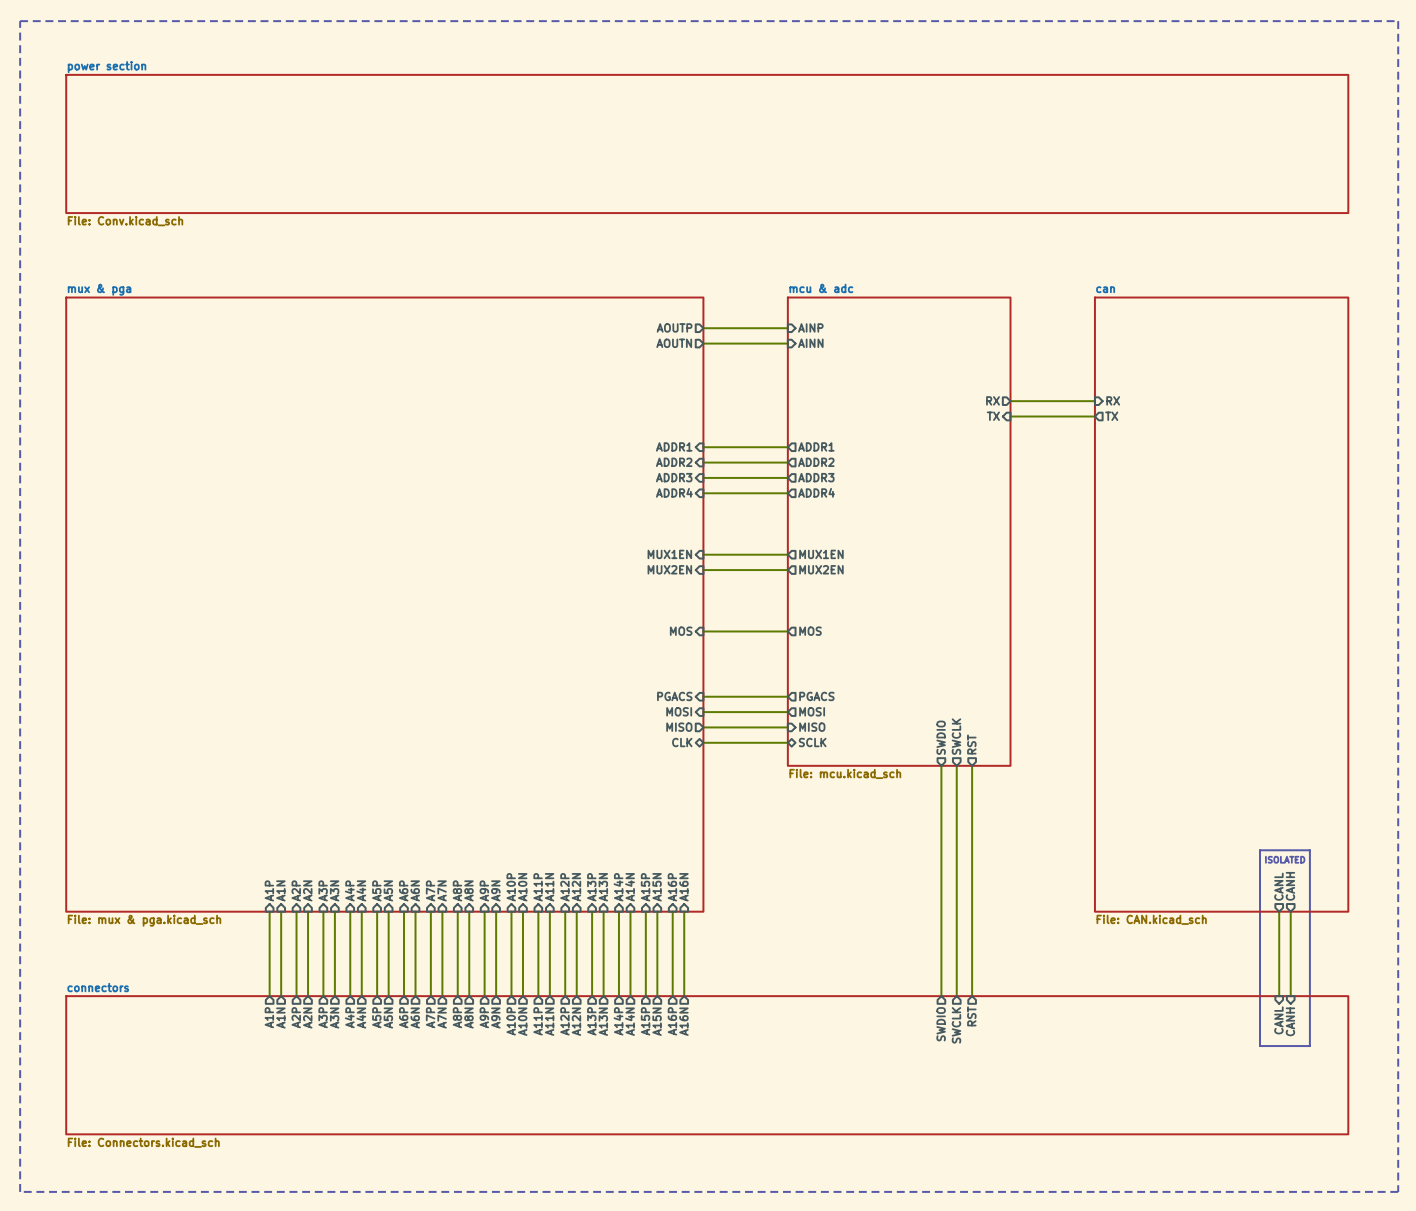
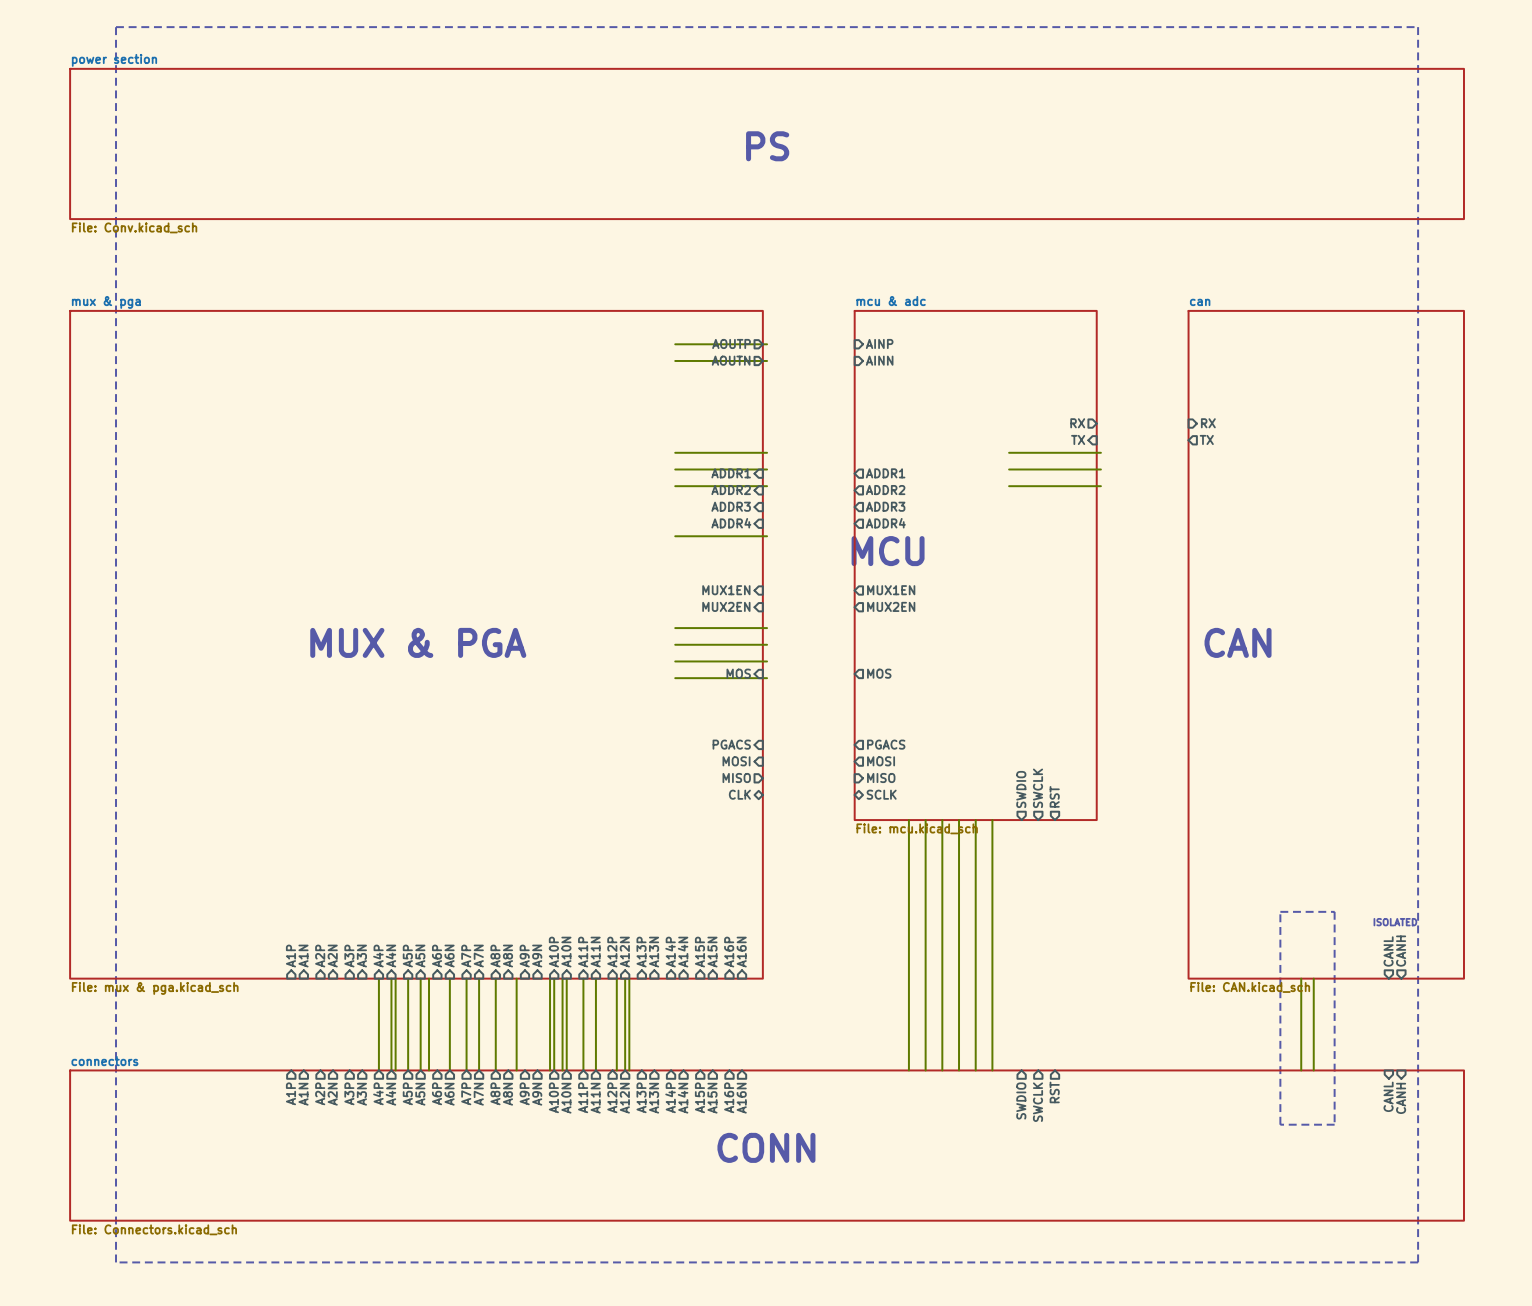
line: (20, 21) (1398, 21) (1398, 1191) (20, 1191) (20, 21) -> (116, 27) (116, 1262) (1418, 1262) (1418, 27) (116, 27)
text: none -> PS (767, 146)
wire: (707, 328) (787, 328) -> (675, 344) (762, 344)
wire: (707, 343) (787, 343) -> (675, 360) (762, 360)
wire: (1010, 401) (1094, 401) -> (1009, 469) (1100, 469)
wire: (1010, 416) (1094, 416) -> (1009, 452) (1100, 452)
wire: (703, 447) (787, 447) -> (675, 486) (767, 486)
wire: none -> (1009, 486) (1100, 486)
wire: (703, 462) (787, 462) -> (675, 469) (767, 469)
wire: (703, 477) (787, 477) -> (675, 452) (767, 452)
wire: (703, 493) (787, 493) -> (675, 536) (767, 536)
text: none -> MCU (888, 551)
wire: (703, 554) (787, 554) -> none
wire: (703, 570) (787, 570) -> none
text: none -> MUX & PGA (418, 642)
text: none -> CAN (1238, 642)
wire: (703, 631) (787, 631) -> none
wire: (703, 696) (787, 696) -> (675, 628) (767, 628)
wire: (703, 712) (787, 712) -> (675, 644) (767, 644)
wire: (703, 727) (787, 727) -> (675, 661) (767, 661)
wire: (703, 742) (787, 742) -> (675, 678) (767, 678)
wire: none -> (908, 820) (908, 1070)
wire: none -> (975, 820) (975, 1070)
wire: none -> (992, 820) (992, 1070)
wire: (941, 765) (941, 996) -> (925, 820) (925, 1070)
wire: (956, 765) (956, 996) -> (942, 820) (942, 1070)
wire: (972, 765) (972, 996) -> (959, 820) (959, 1070)
line: (1260, 850) (1309, 850) (1309, 1046) (1260, 1046) (1260, 850) -> (1280, 911) (1334, 911) (1334, 1124) (1280, 1124) (1280, 911)
wire: (269, 911) (269, 996) -> none
wire: (281, 911) (281, 996) -> none
wire: (296, 911) (296, 996) -> none
wire: (308, 911) (308, 996) -> none
wire: (323, 911) (323, 996) -> none
wire: (334, 911) (334, 996) -> none
wire: (404, 911) (404, 996) -> none
wire: (469, 911) (469, 996) -> (395, 978) (395, 1070)
wire: (484, 911) (484, 996) -> (429, 978) (429, 1070)
wire: (496, 911) (496, 996) -> none
wire: (565, 911) (565, 996) -> (516, 978) (516, 1070)
wire: (592, 911) (592, 996) -> (562, 978) (562, 1070)
wire: (603, 911) (603, 996) -> none
wire: (618, 911) (618, 996) -> (550, 978) (550, 1070)
wire: (630, 911) (630, 996) -> none
wire: (645, 911) (645, 996) -> none
wire: (657, 911) (657, 996) -> (616, 978) (616, 1070)
wire: (672, 911) (672, 996) -> none
wire: (684, 911) (684, 996) -> (629, 978) (629, 1070)
wire: (1279, 911) (1279, 996) -> (1301, 978) (1301, 1070)
wire: (1290, 911) (1290, 996) -> (1313, 978) (1313, 1070)
text: none -> CONN (766, 1147)

